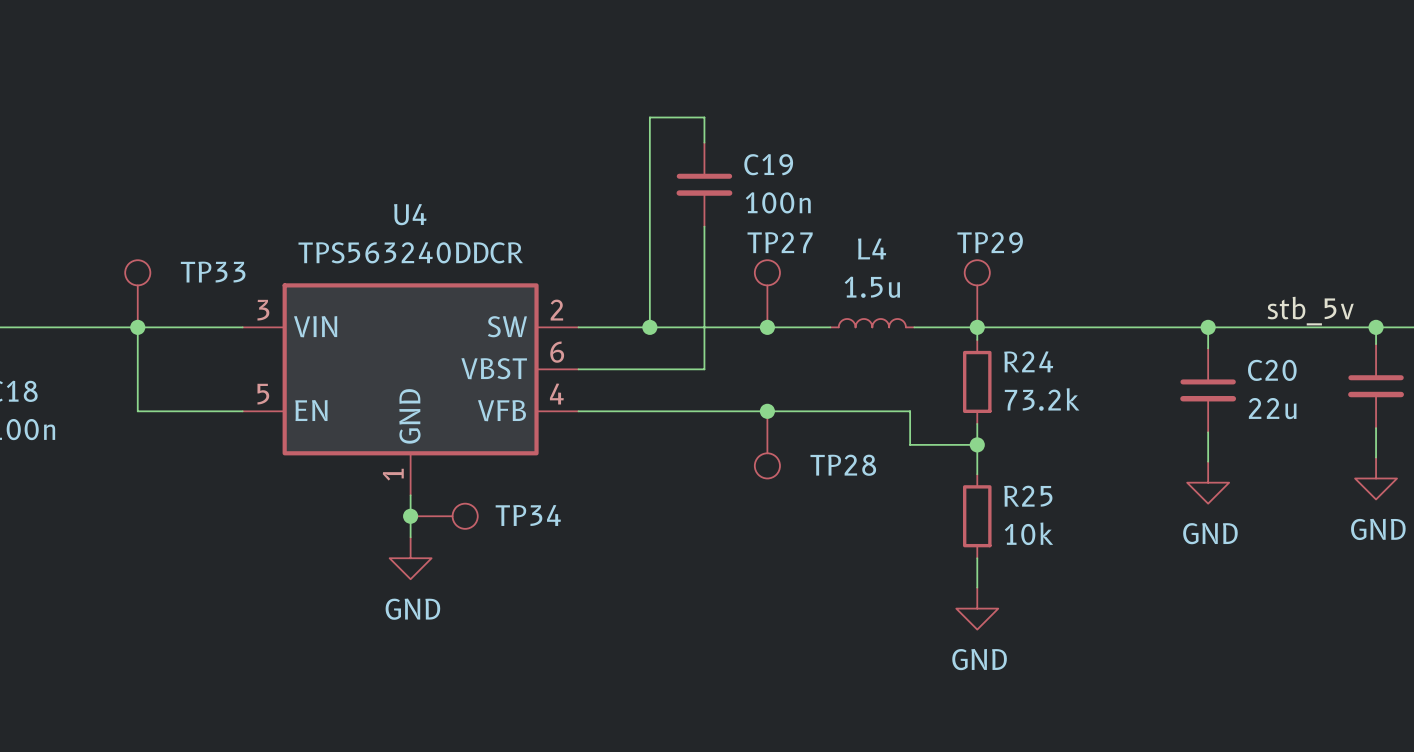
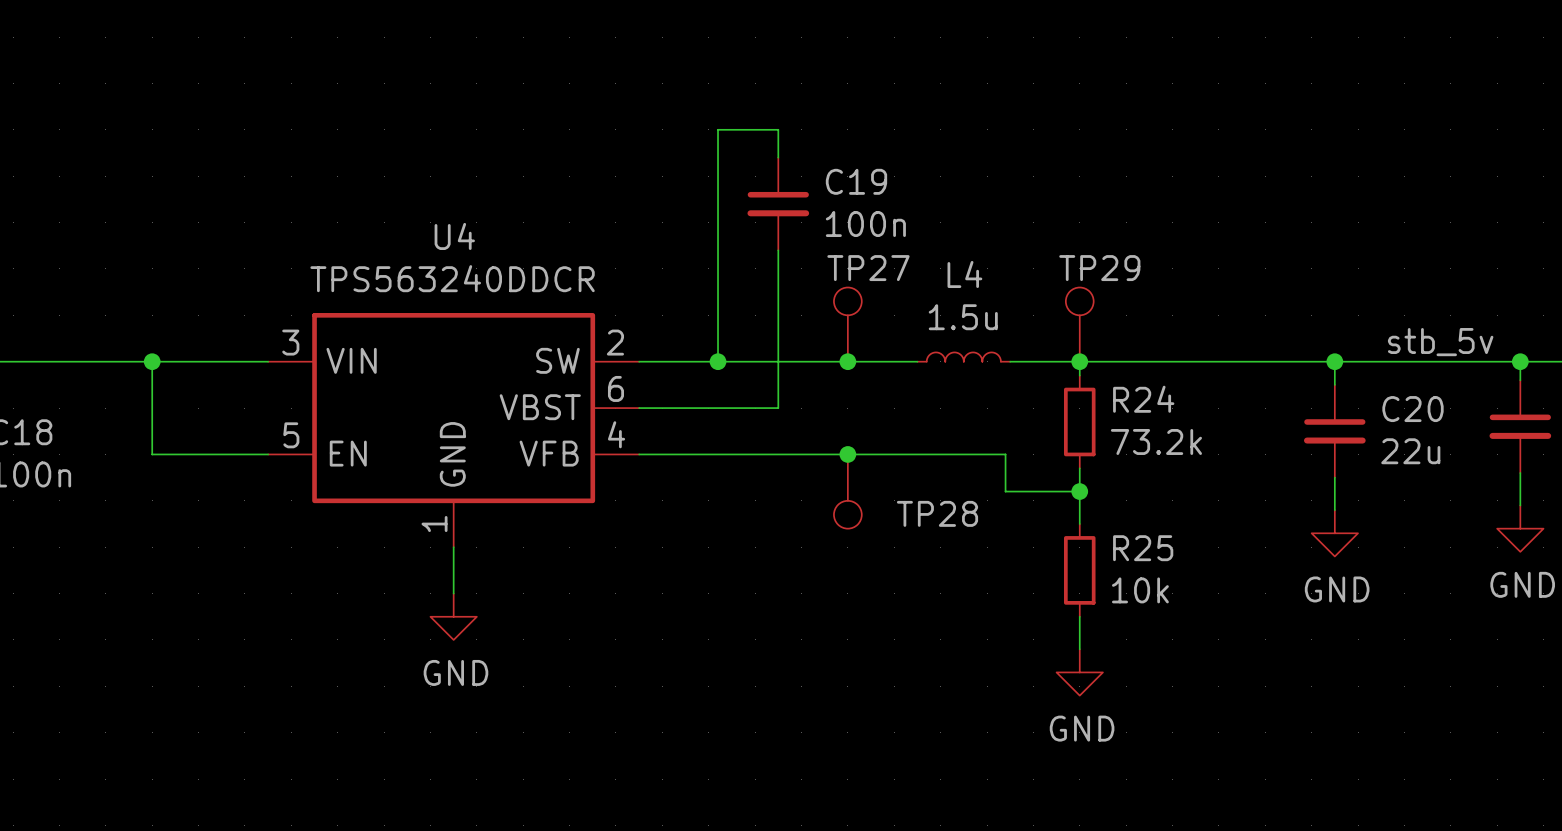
TP33: (137, 293) -> none
junction: (410, 516) -> none
TP34: (444, 516) -> none

